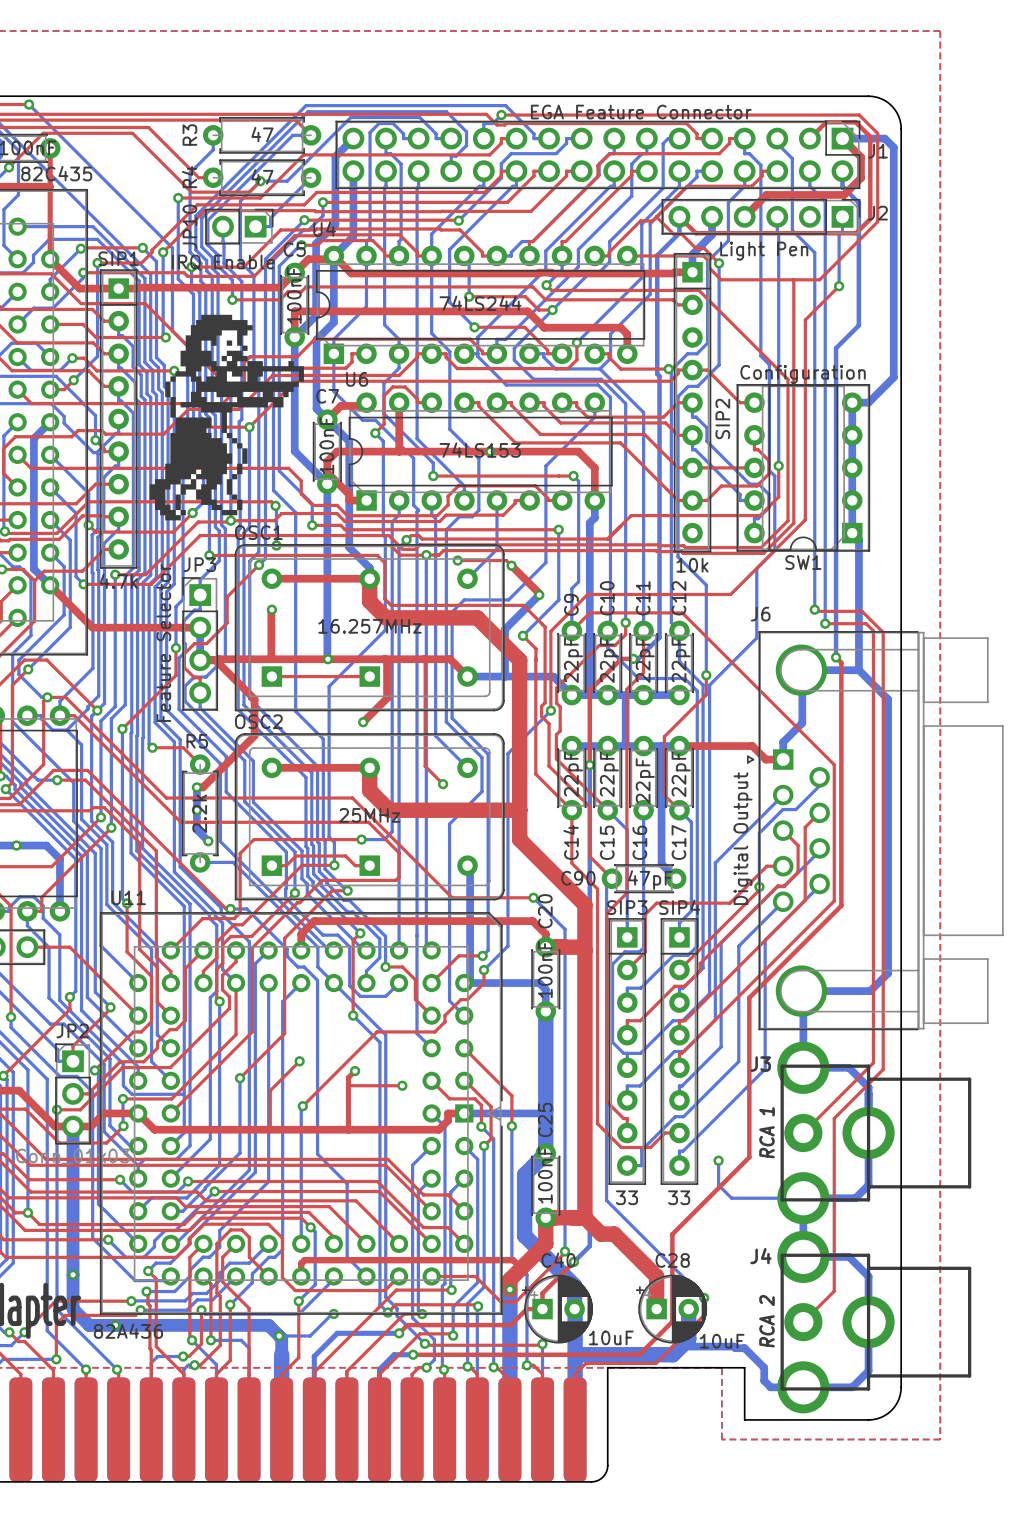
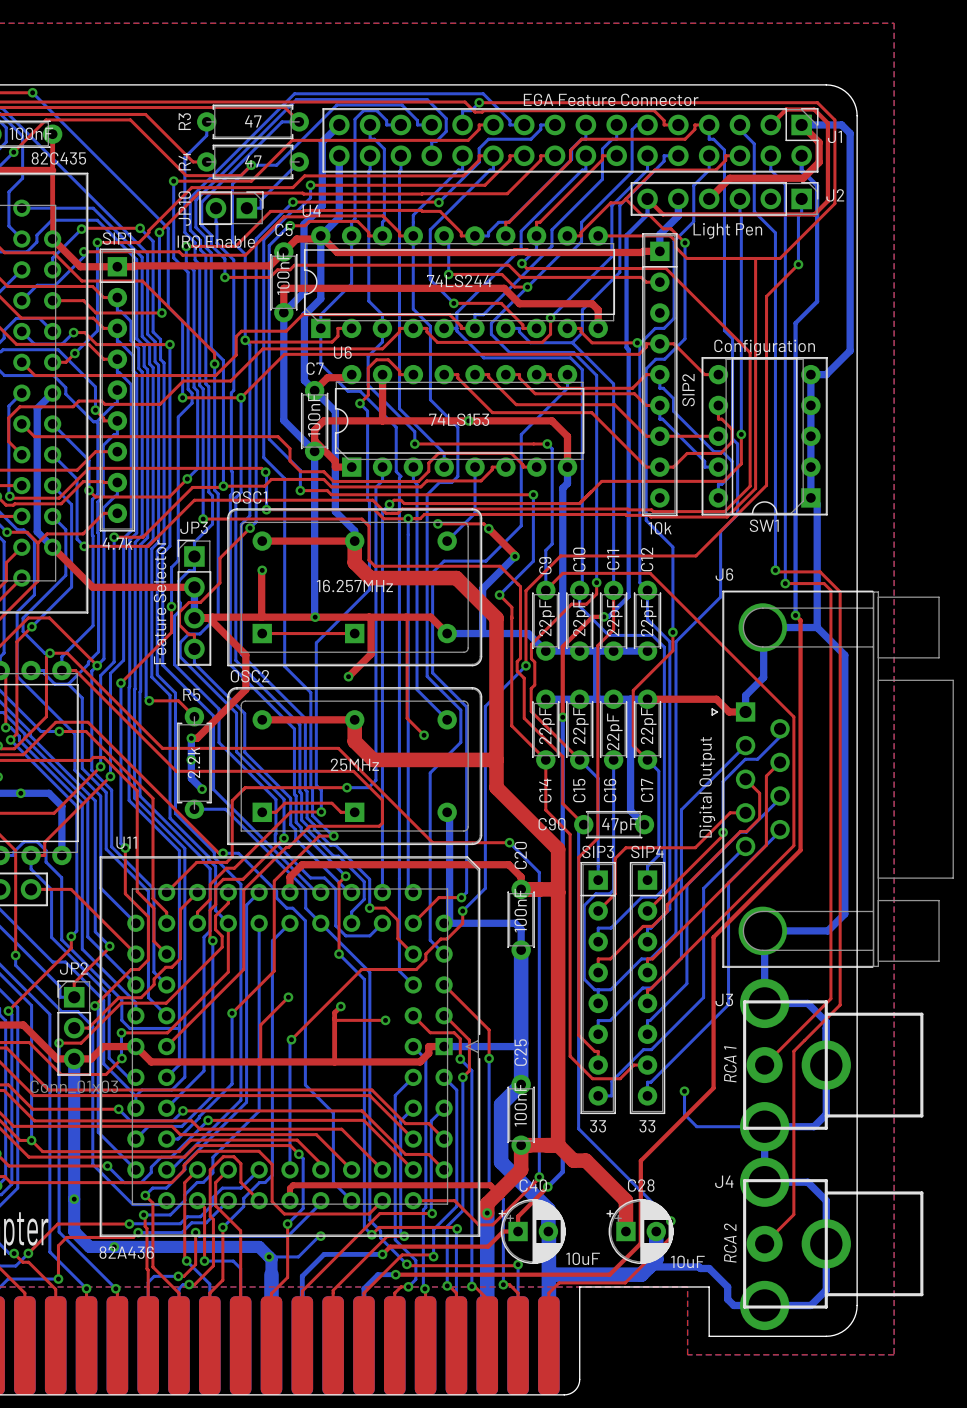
drawing: [149, 314, 304, 521] -> none

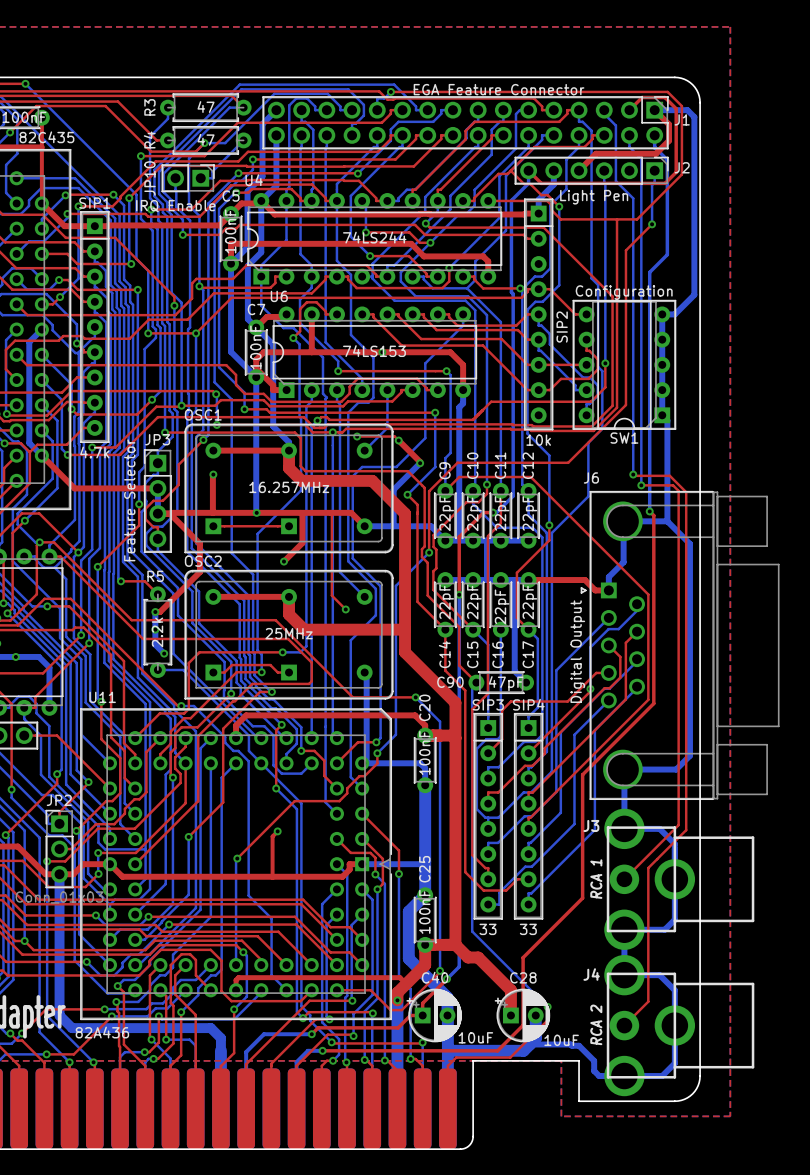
top track: (288, 997) (260, 1025) (259, 1061) -> none
via: (288, 997) -> none
top track: (334, 1018) (385, 1020) -> none
via: (385, 1020) -> none
bottom track: (684, 1091) (684, 1114) (696, 1126) (764, 1126) -> none
via: (684, 1091) -> none
via: (74, 1199) -> none
bottom track: (320, 1236) (298, 1256) (269, 1256) -> none
via: (320, 1236) -> none
top track: (133, 1237) (66, 1237) (58, 1245) (58, 1279) -> (107, 1020) (73, 1054) (46, 1054)
via: (114, 1246) -> none
via: (269, 1256) -> none

